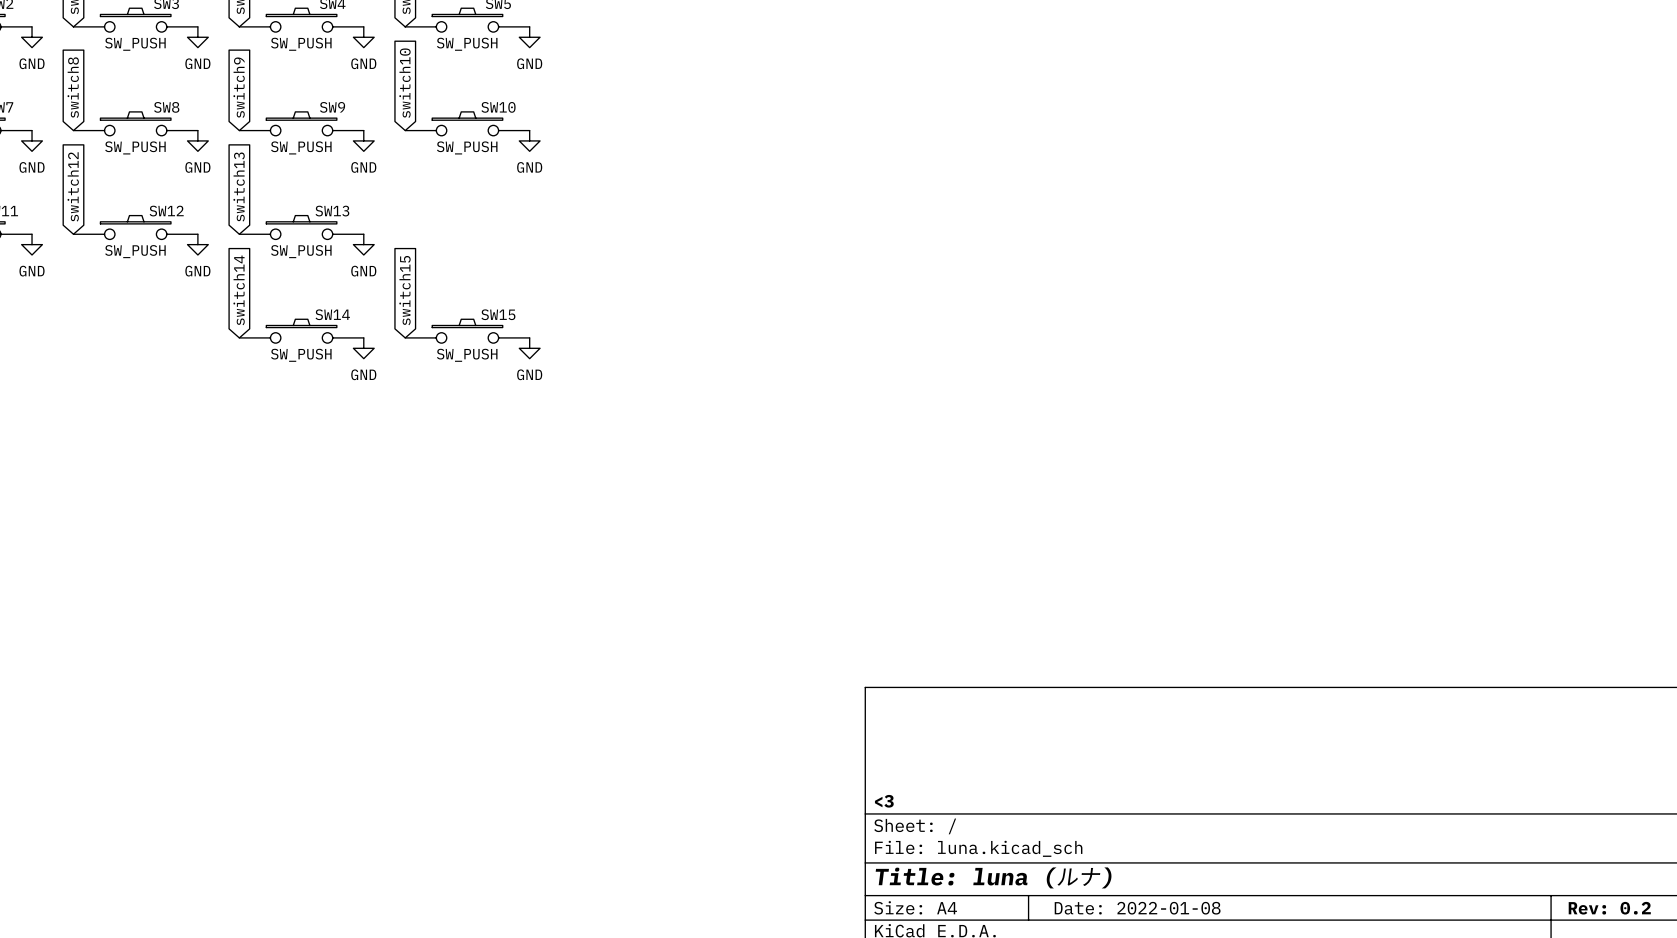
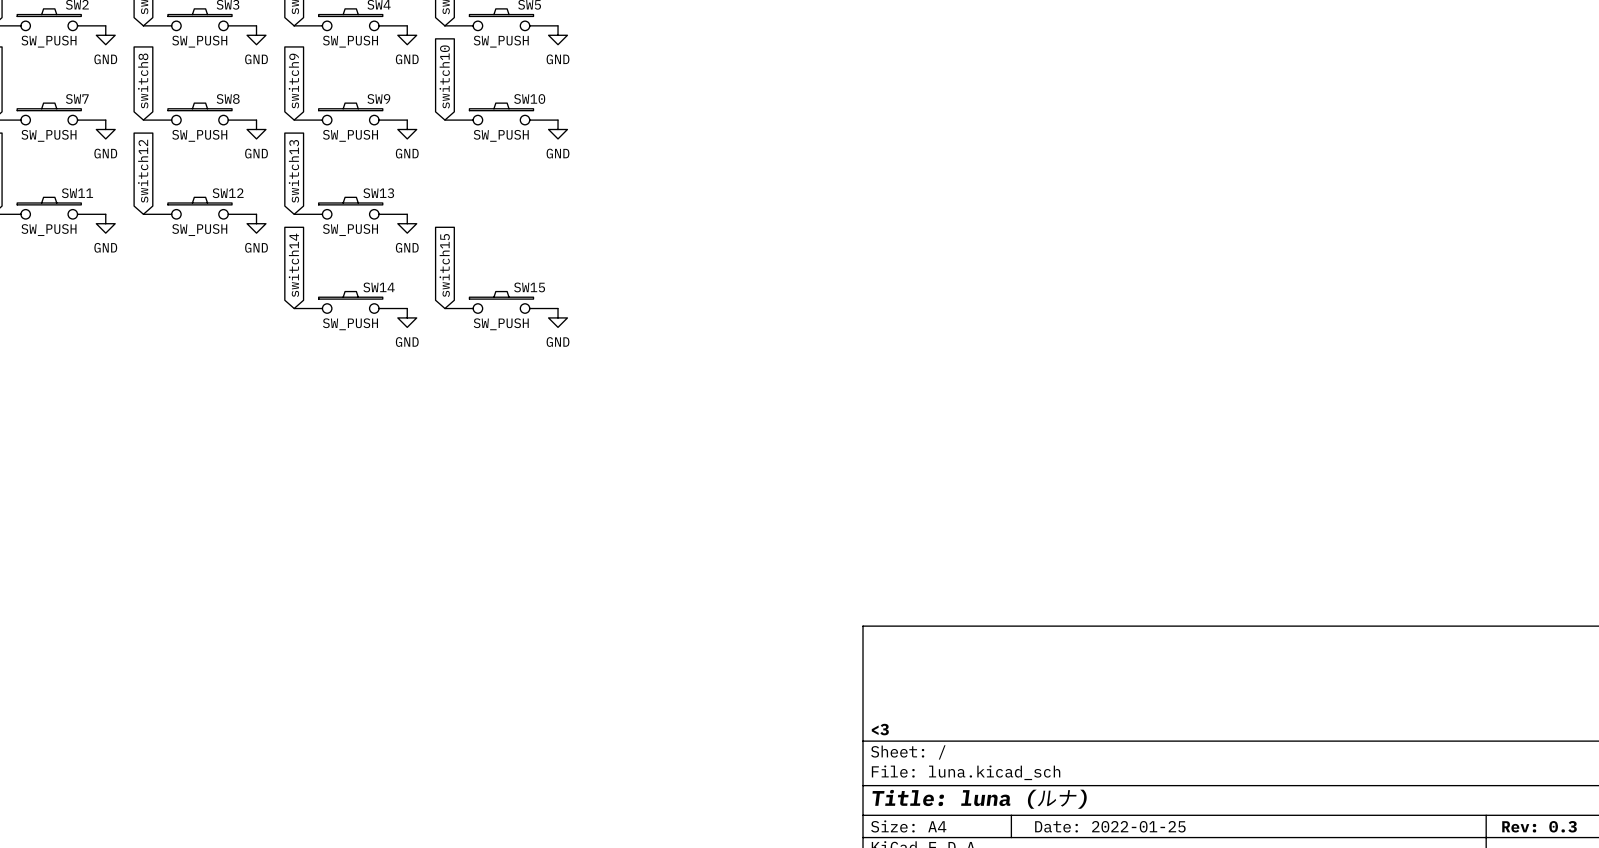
title block: Date: 2022-01-08 (1137, 908) -> Date: 2022-01-25 (1110, 826)
title block: Rev: 0.2 (1609, 908) -> Rev: 0.3 (1539, 826)

